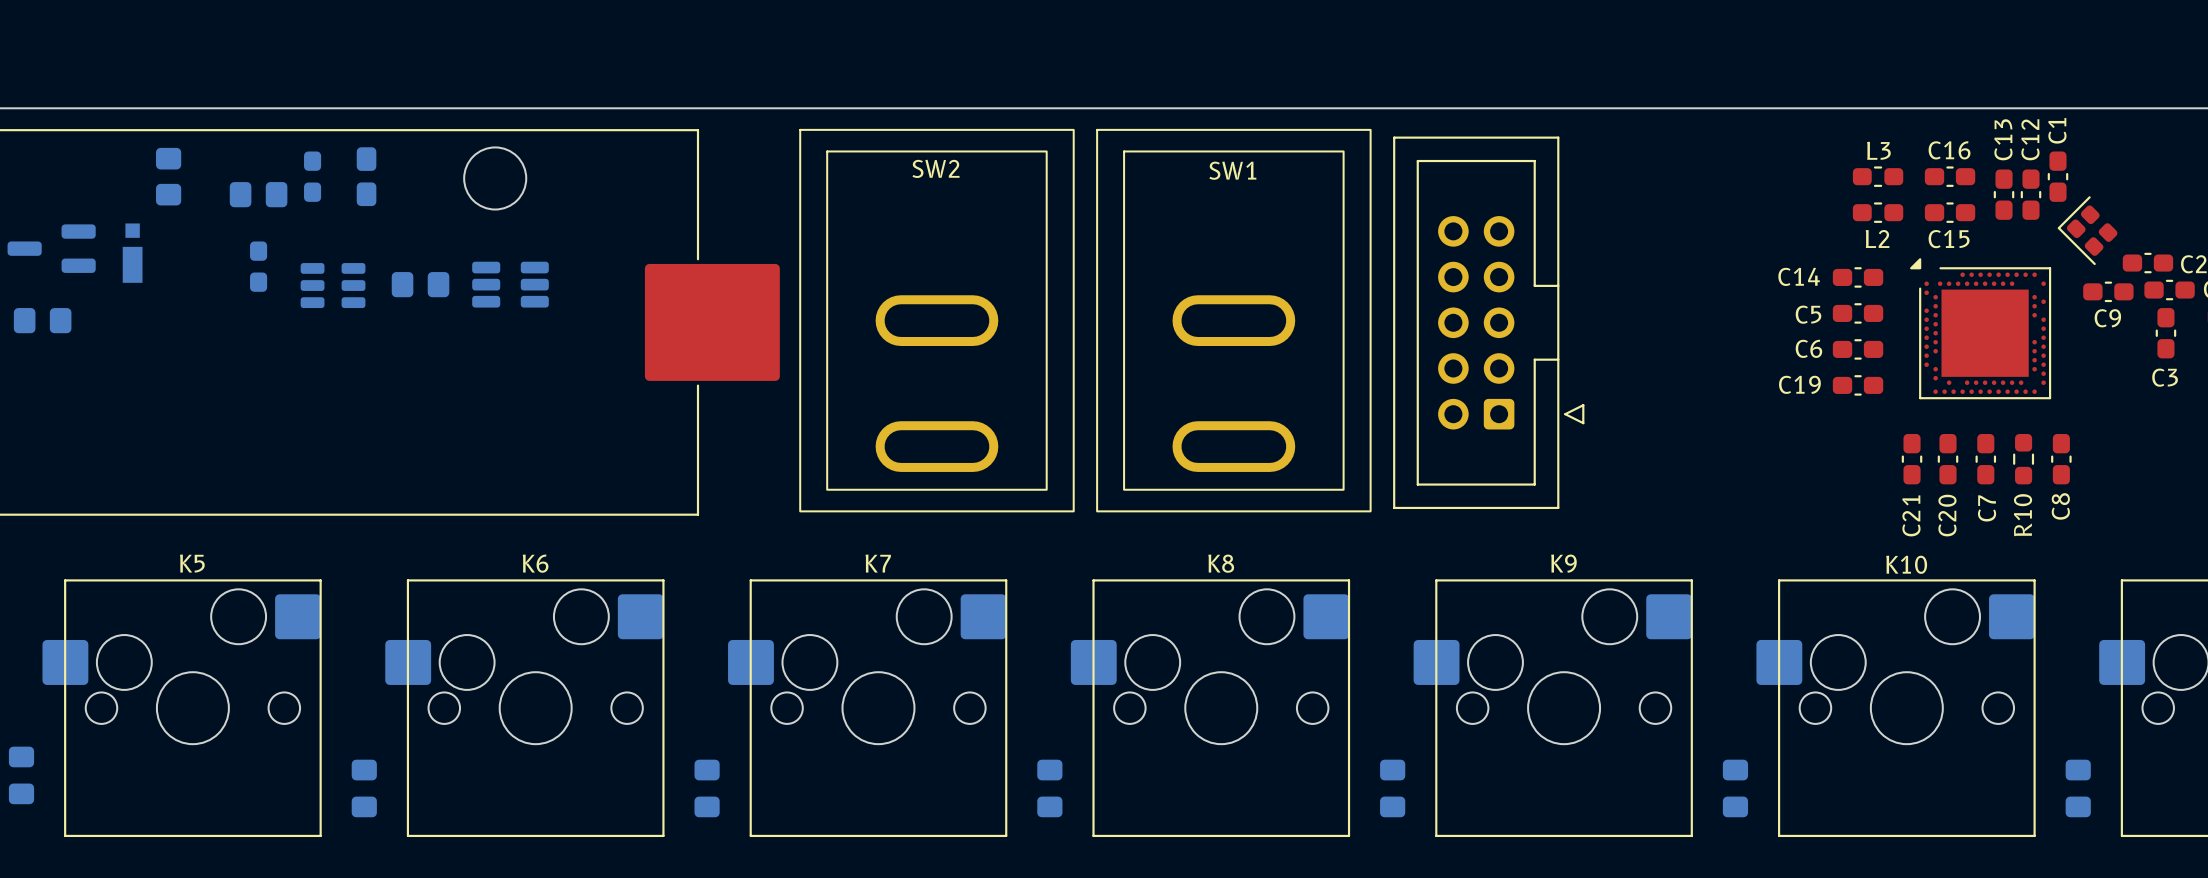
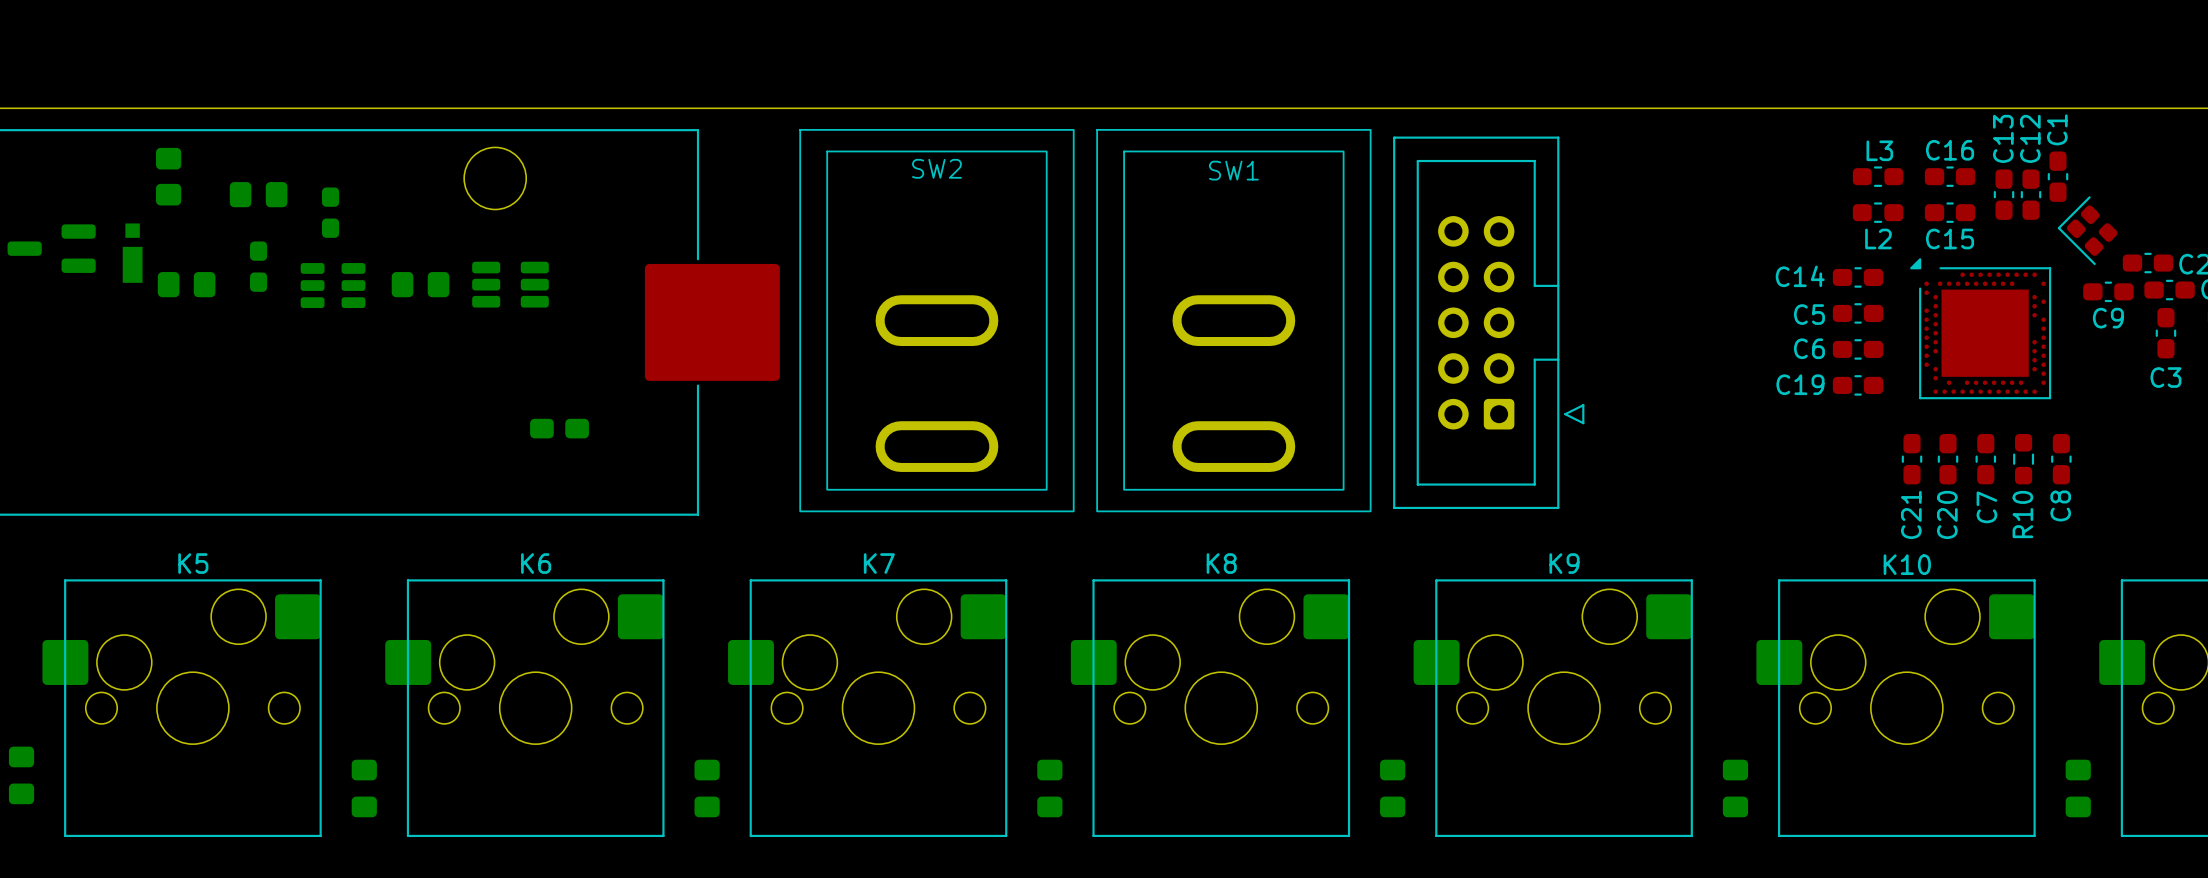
part position: (312, 176) -> (330, 212)
part rotation: 0° (366, 176) -> 90° clockwise (559, 428)
part position: (366, 176) -> (559, 428)
part position: (42, 320) -> (186, 284)

